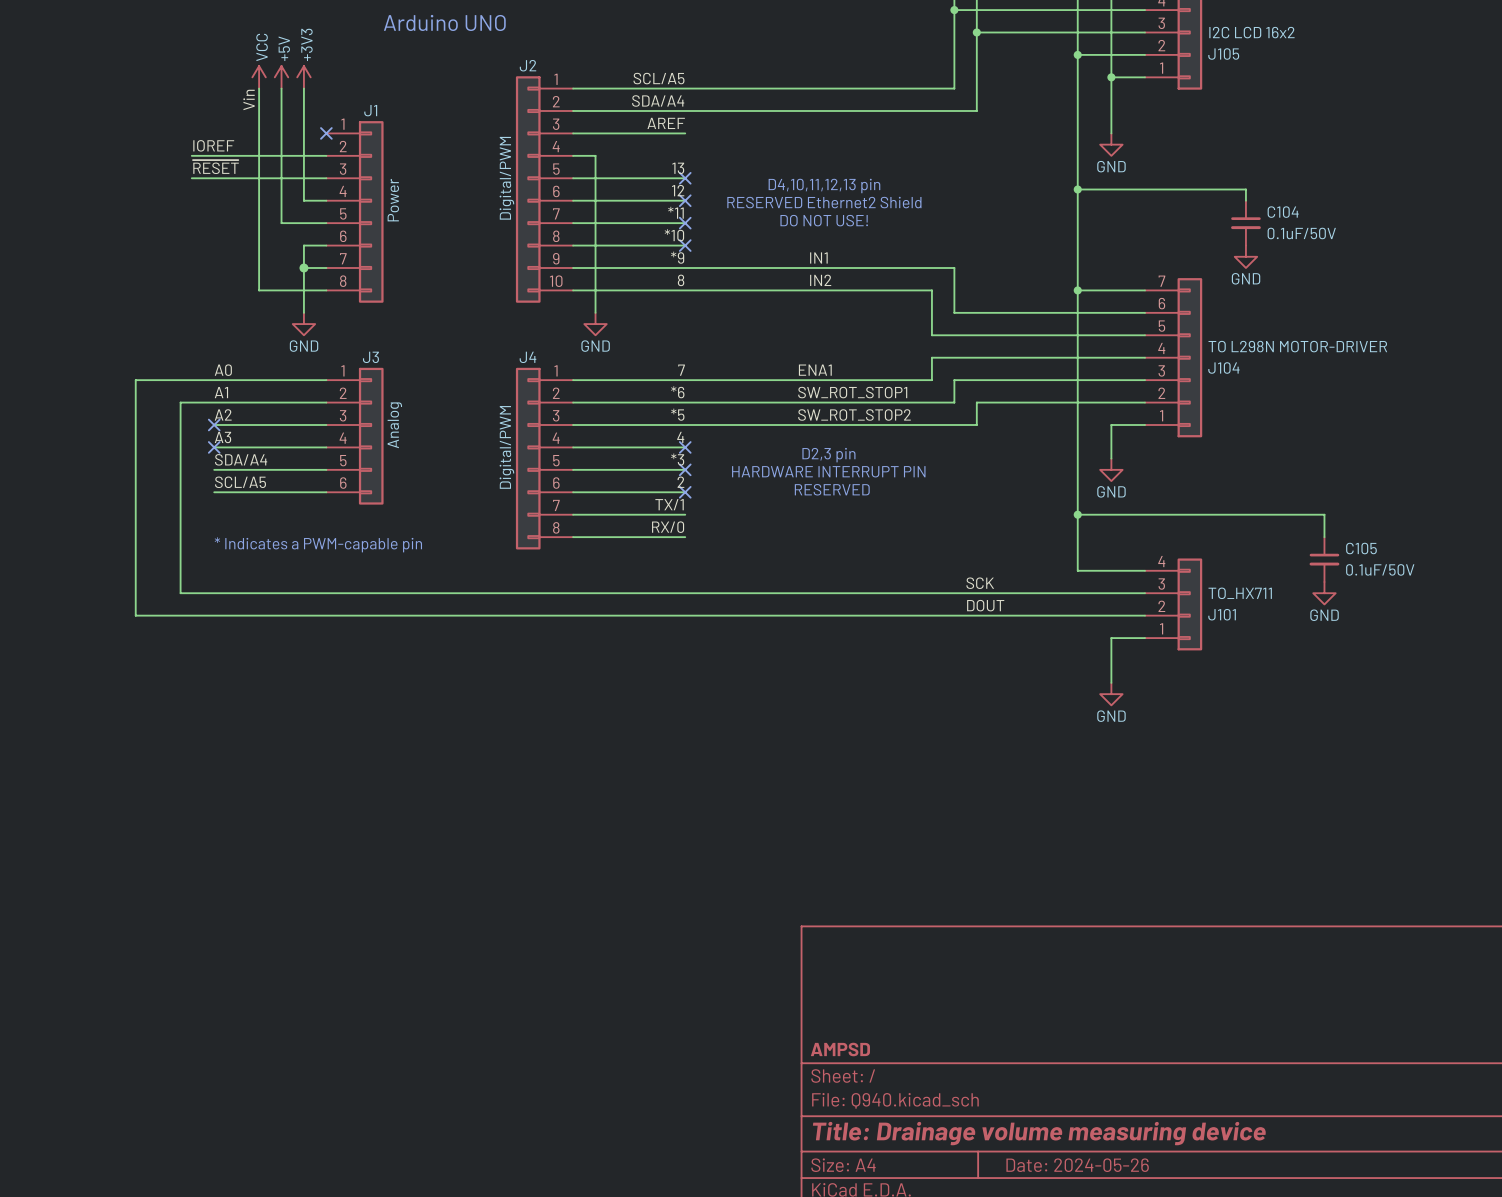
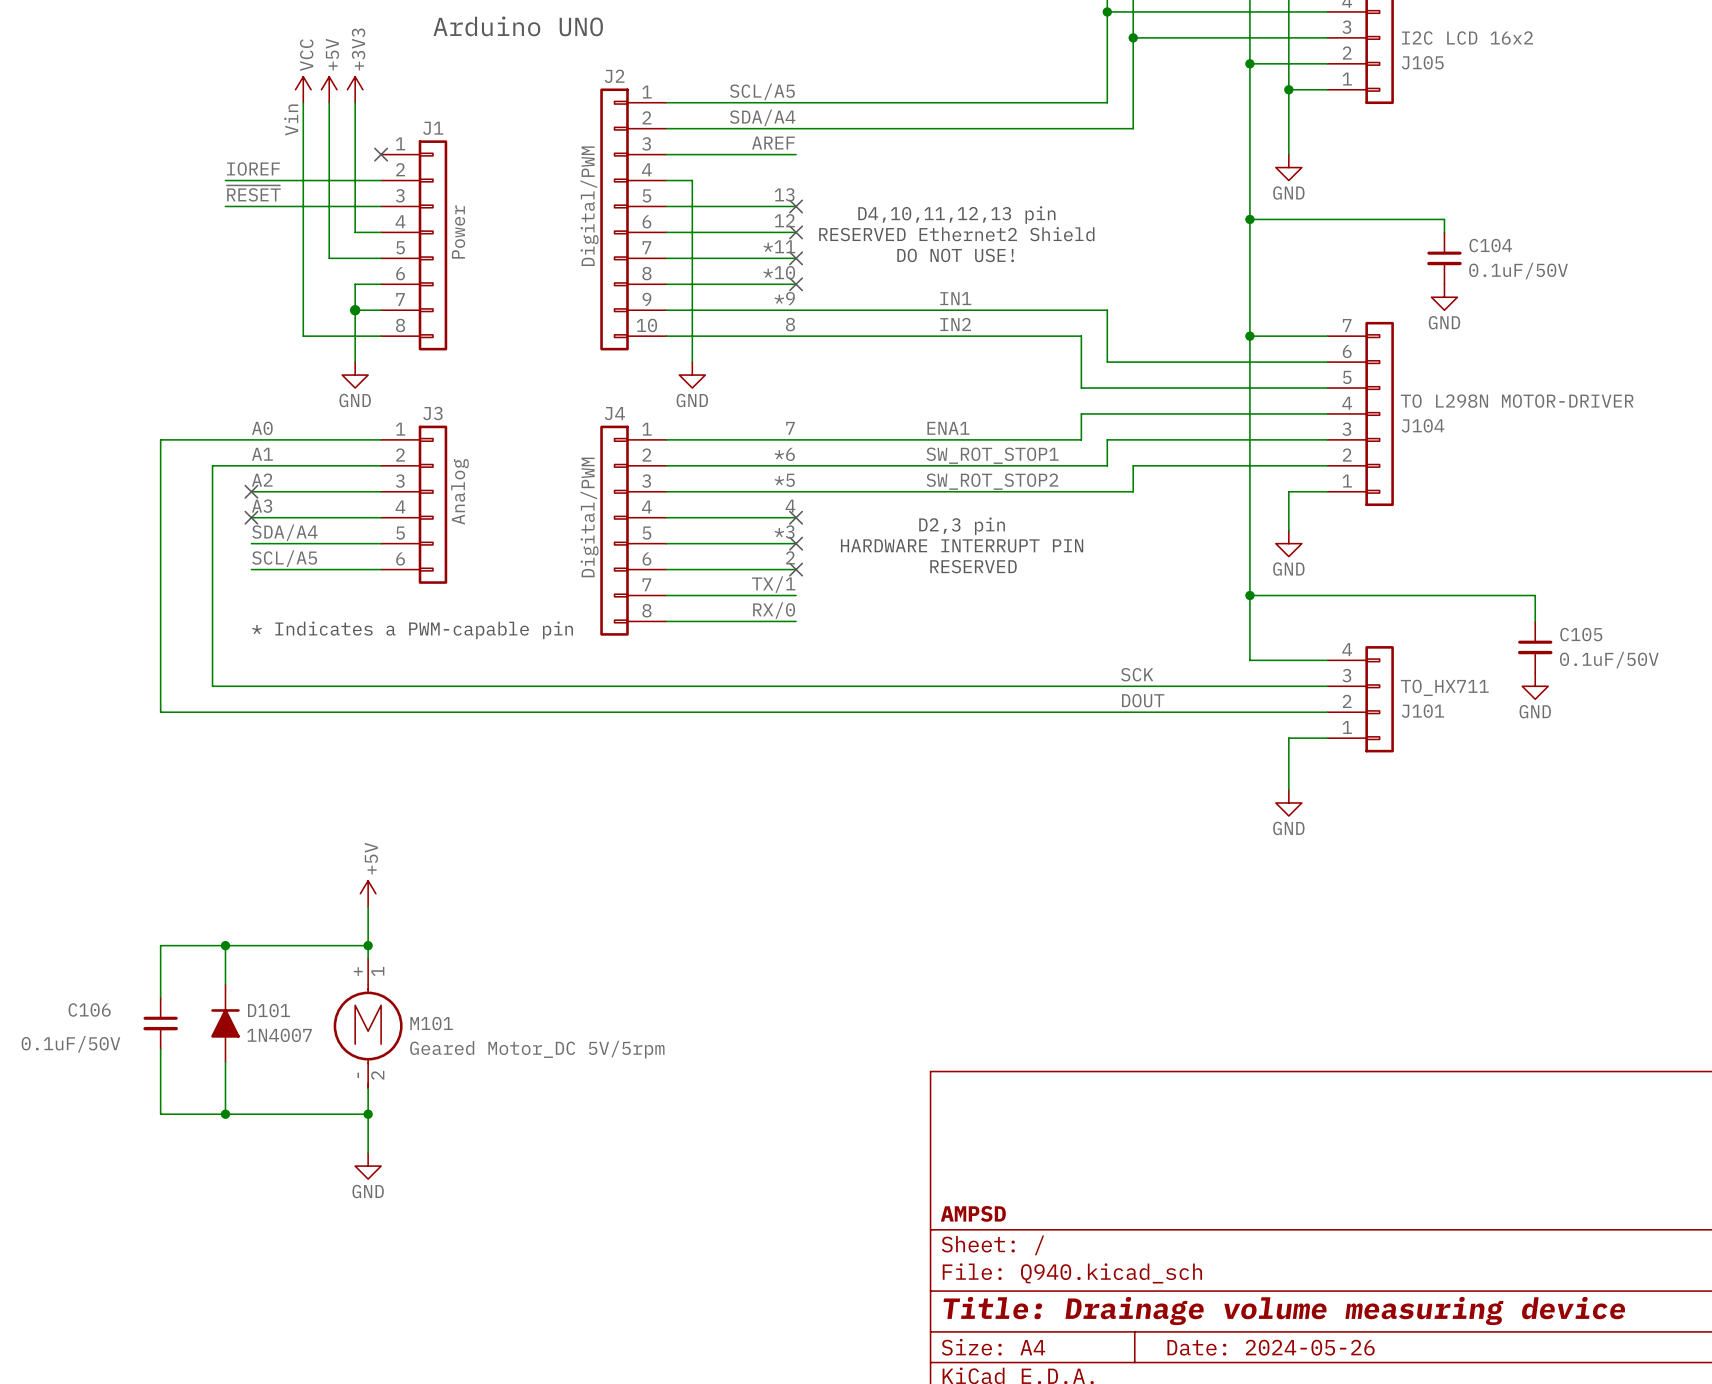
power symbol: none -> +5V (368, 893)
wire: none -> (368, 906) (368, 958)
wire: none -> (225, 945) (225, 984)
junction: none -> (225, 945)
wire: none -> (368, 945) (160, 945) (160, 997)
junction: none -> (368, 945)
C106: none -> 0.1uF/50V (160, 1023)
D101: none -> 1N4007 (225, 1023)
M101: none -> Geared Motor_DC 5V/5rpm (368, 1023)
wire: none -> (160, 1049) (160, 1114) (368, 1114)
wire: none -> (225, 1062) (225, 1114)
wire: none -> (368, 1088) (368, 1153)
junction: none -> (225, 1114)
junction: none -> (368, 1114)
power symbol: none -> GND (368, 1166)

